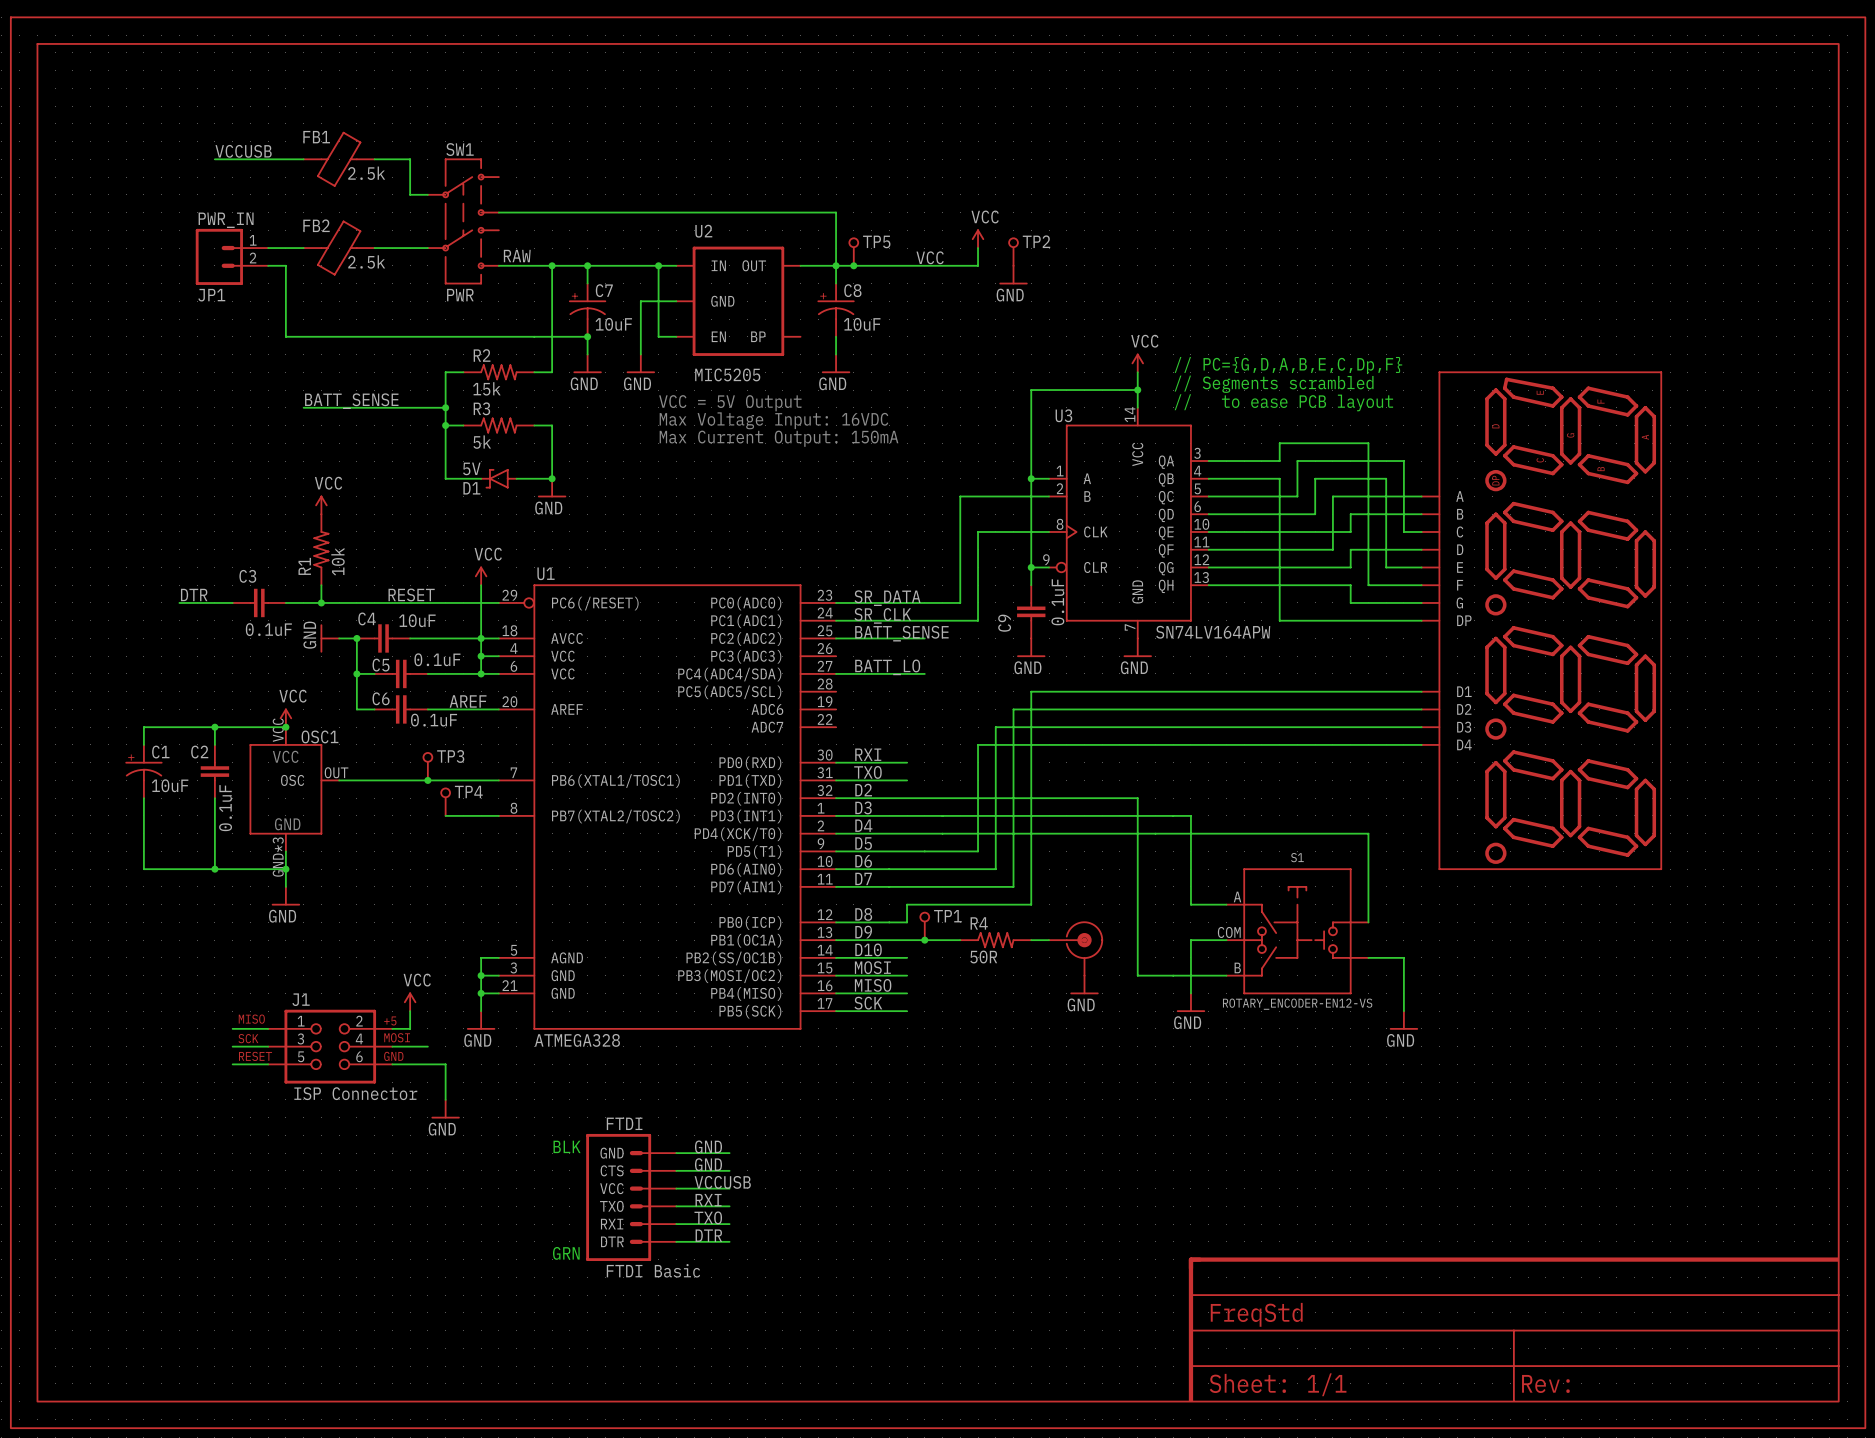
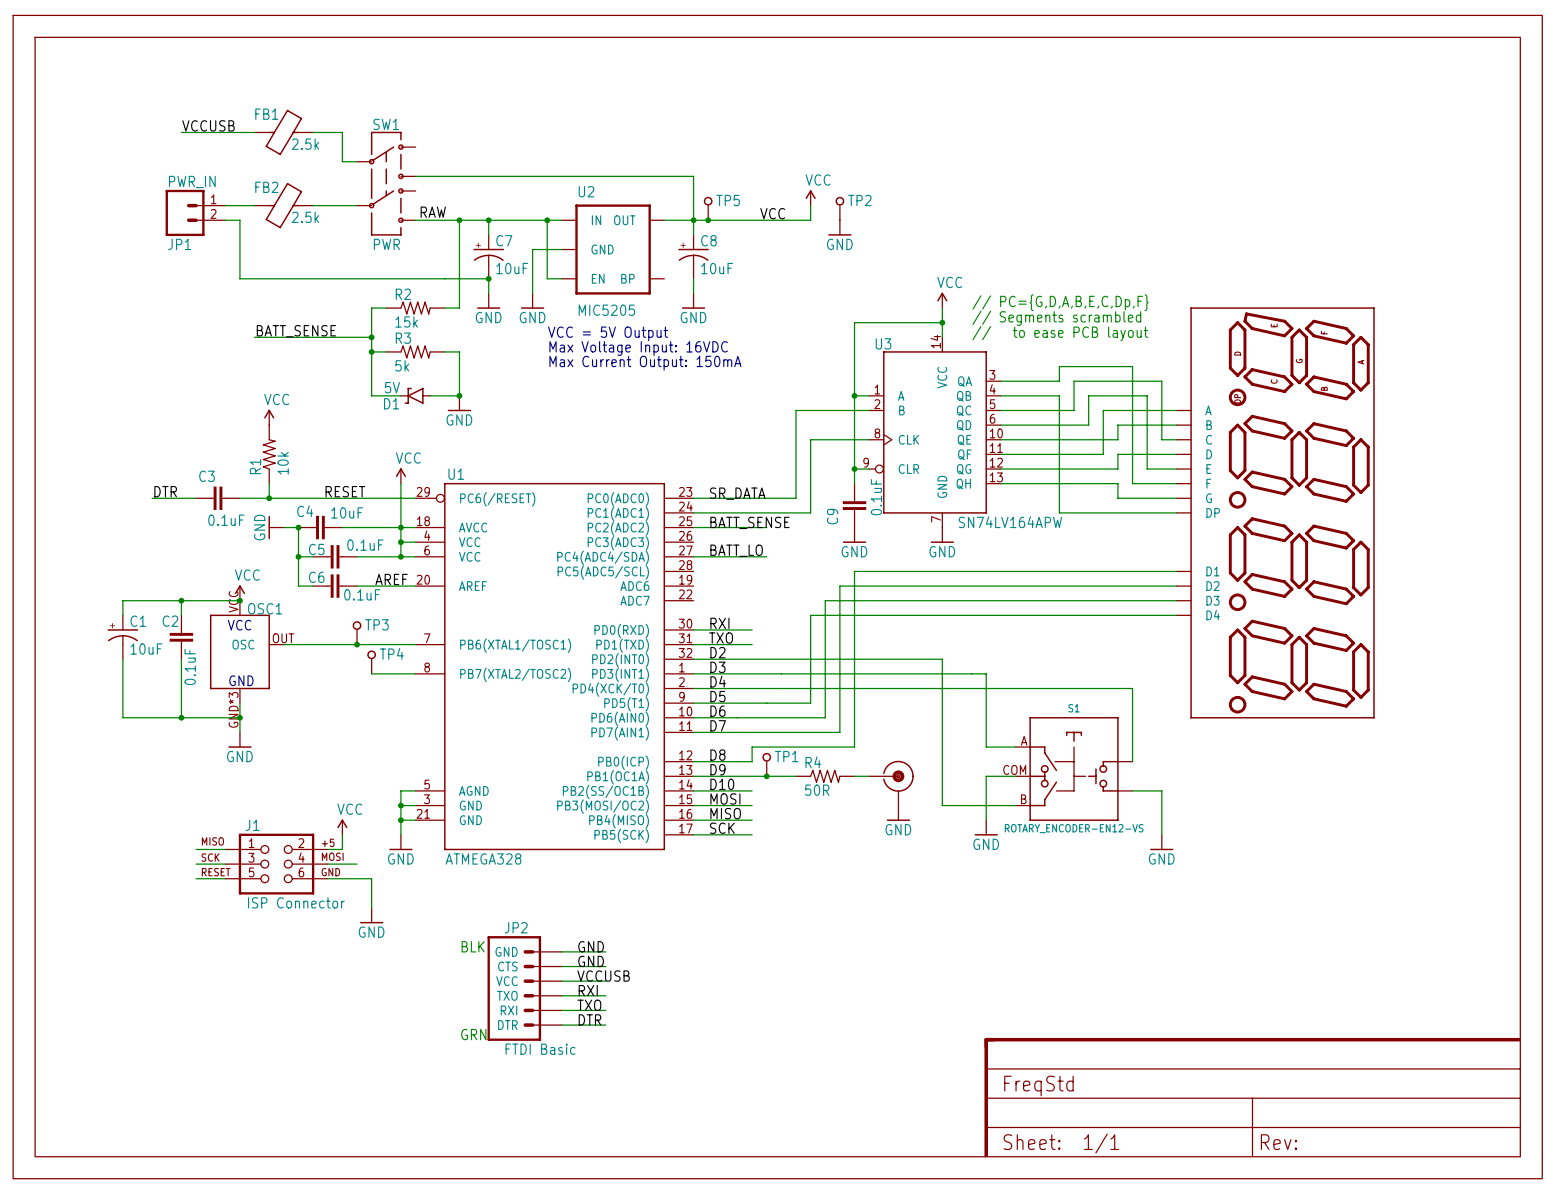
label: SR_CLK (882, 615) -> none
FTDI name: FTDI (624, 1123) -> JP2 (516, 927)

